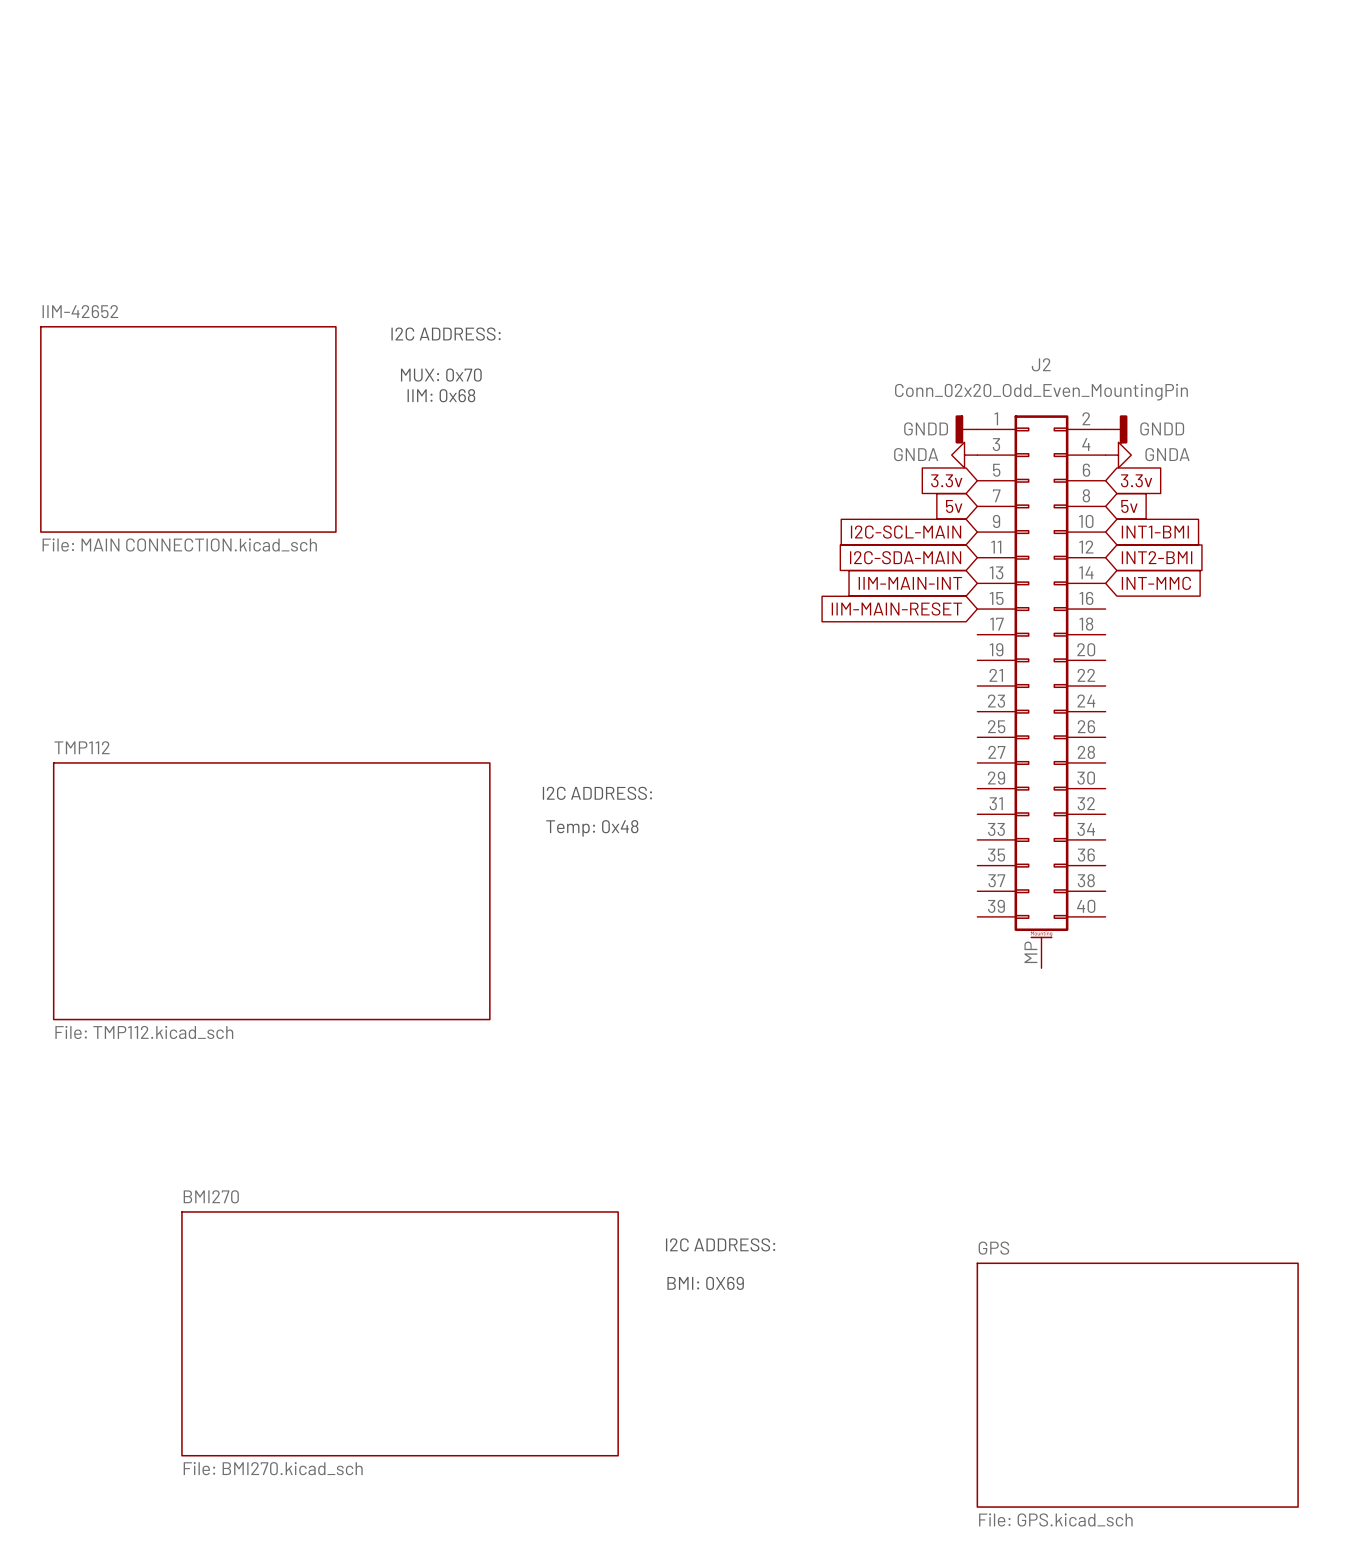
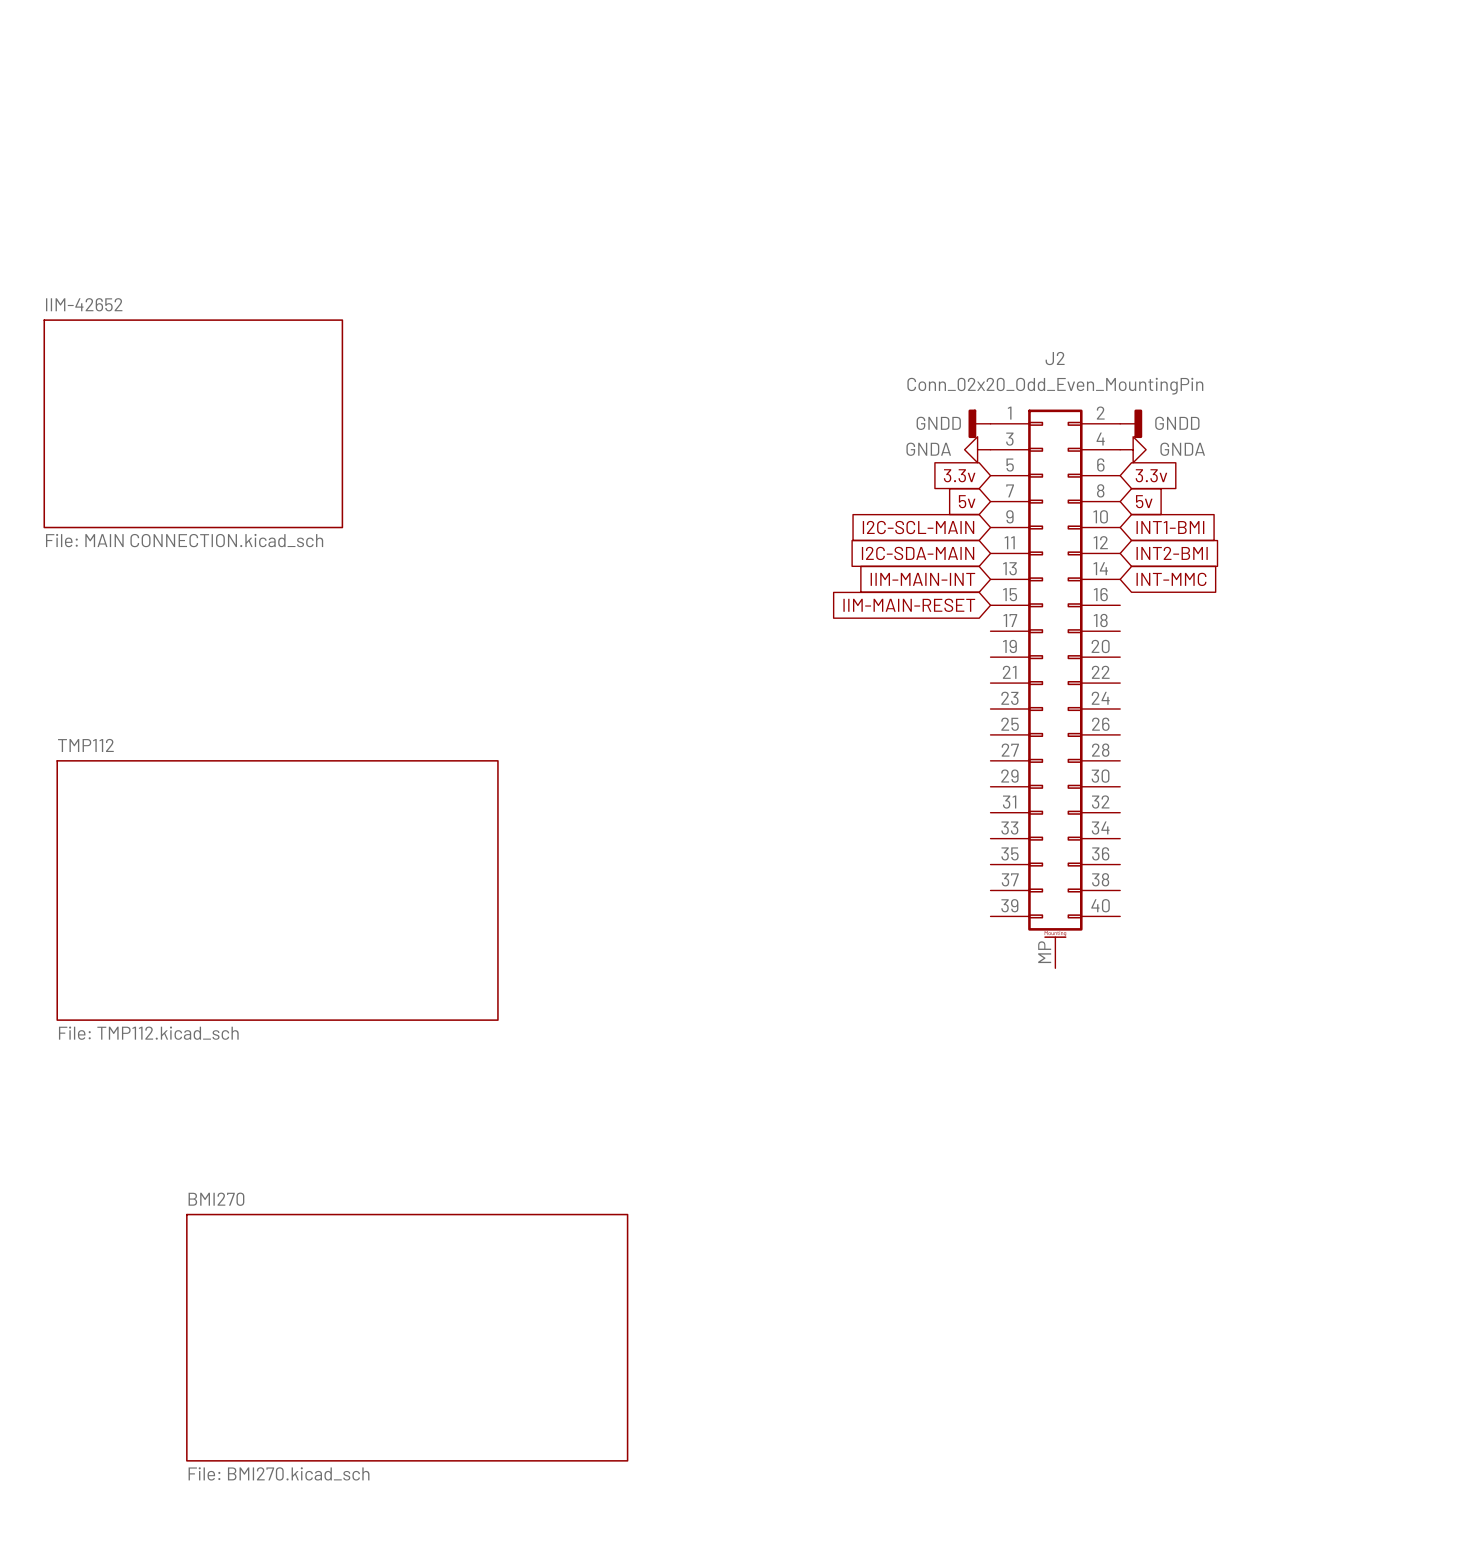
text: I2C ADDRESS: (446, 334) -> none
text: MUX: 0x70 (441, 375) -> none
text: IIM: 0x68 (441, 395) -> none
text: I2C ADDRESS: (597, 793) -> none
text: Temp: 0x48 (592, 828) -> none
text: I2C ADDRESS: (720, 1244) -> none
text: BMI: 0X69 (705, 1283) -> none
sheet GPS: File: GPS.kicad_sch (1137, 1385) -> none

